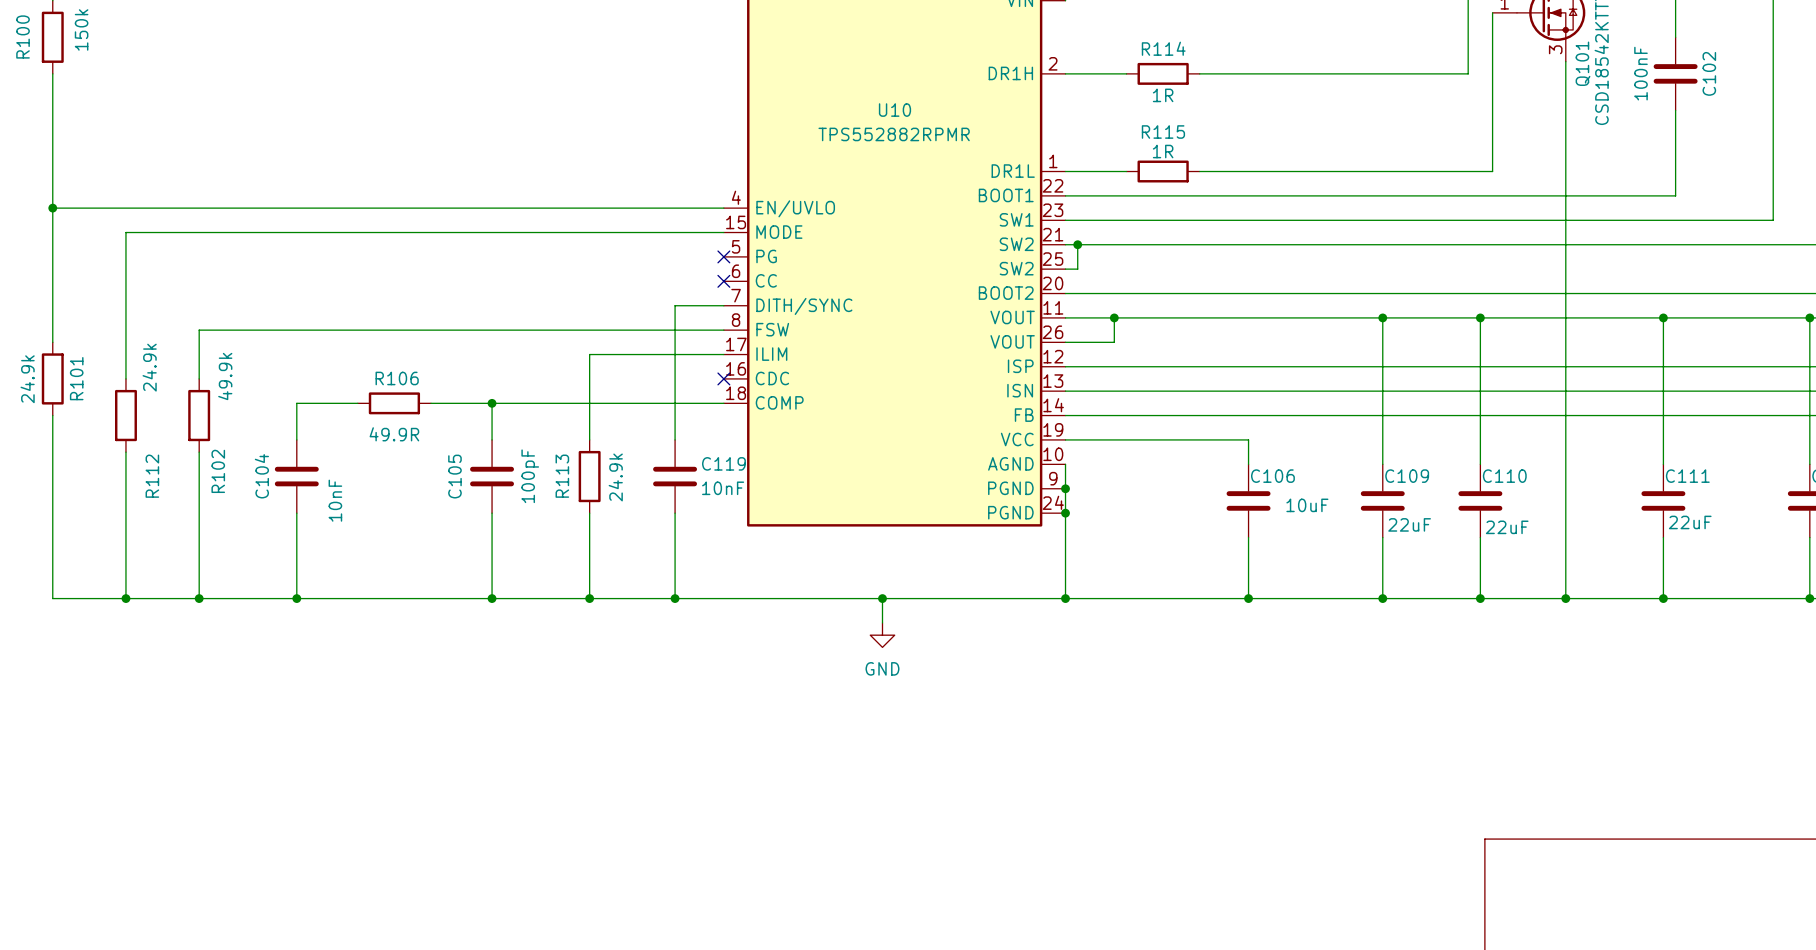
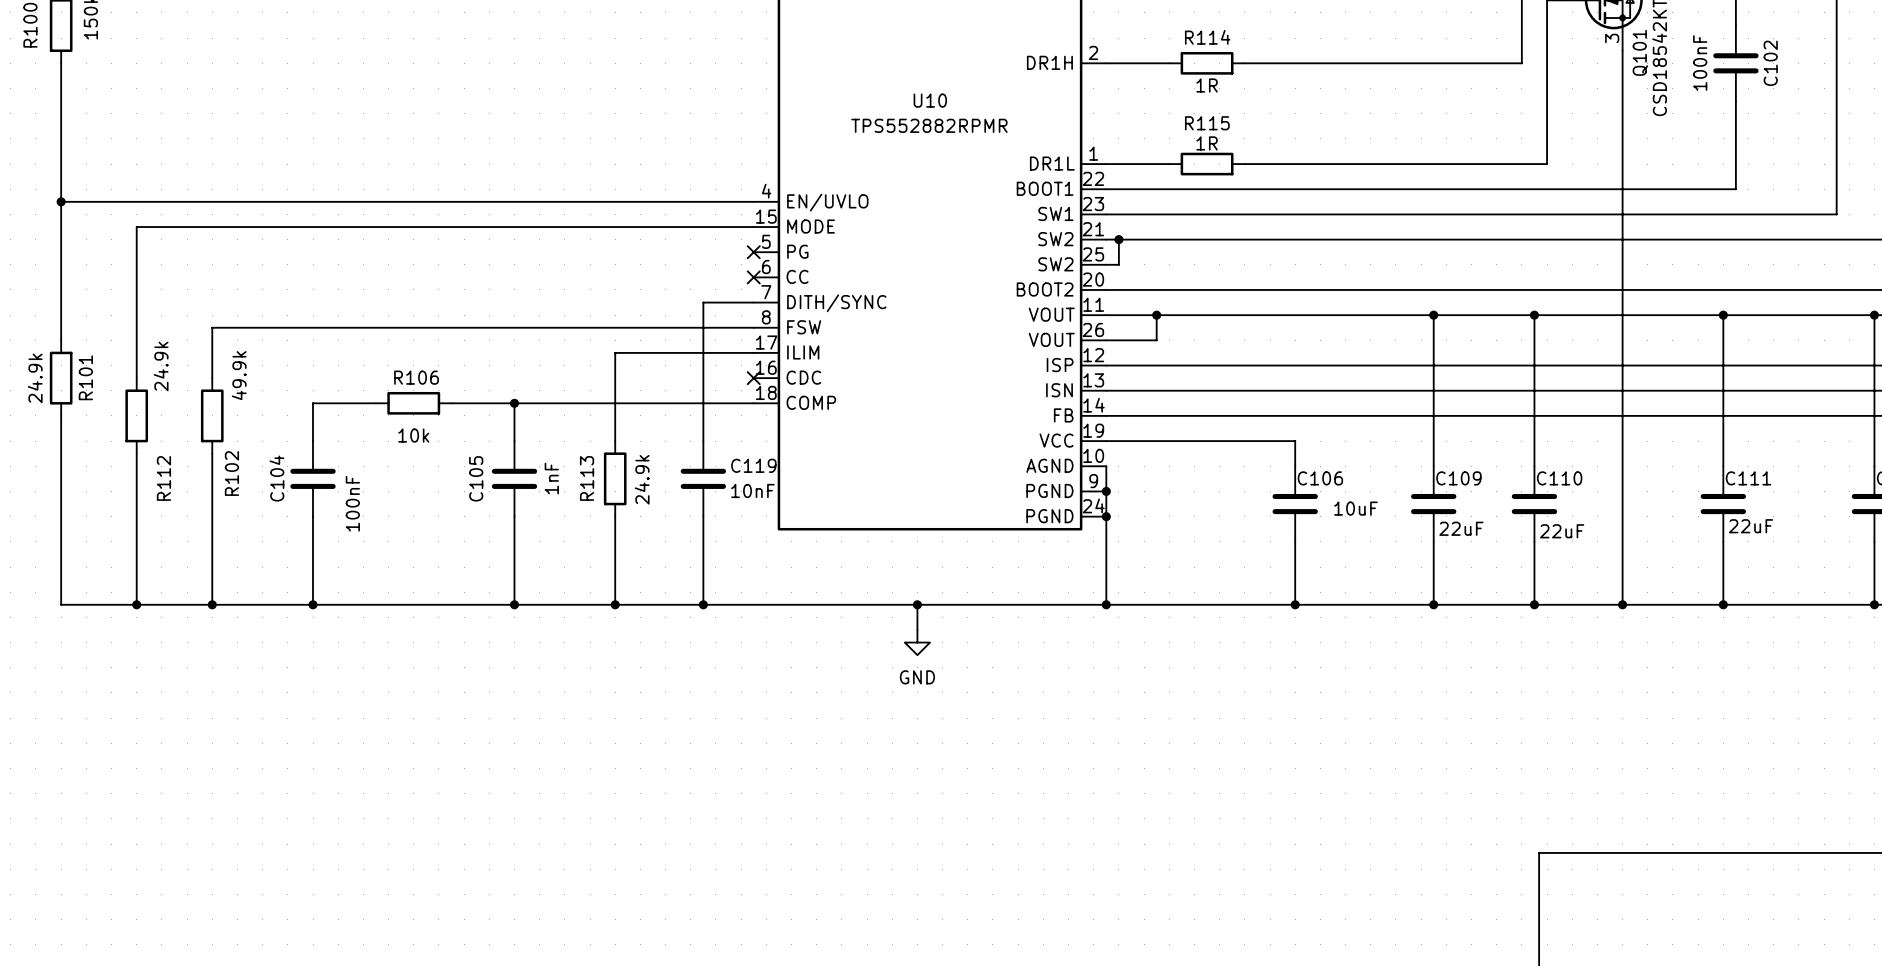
R106 value: 49.9R (394, 434) -> 10k (413, 435)
C105 value: 100pF (530, 476) -> 1nF (551, 478)
C104 value: 10nF (335, 500) -> 100nF (352, 503)

